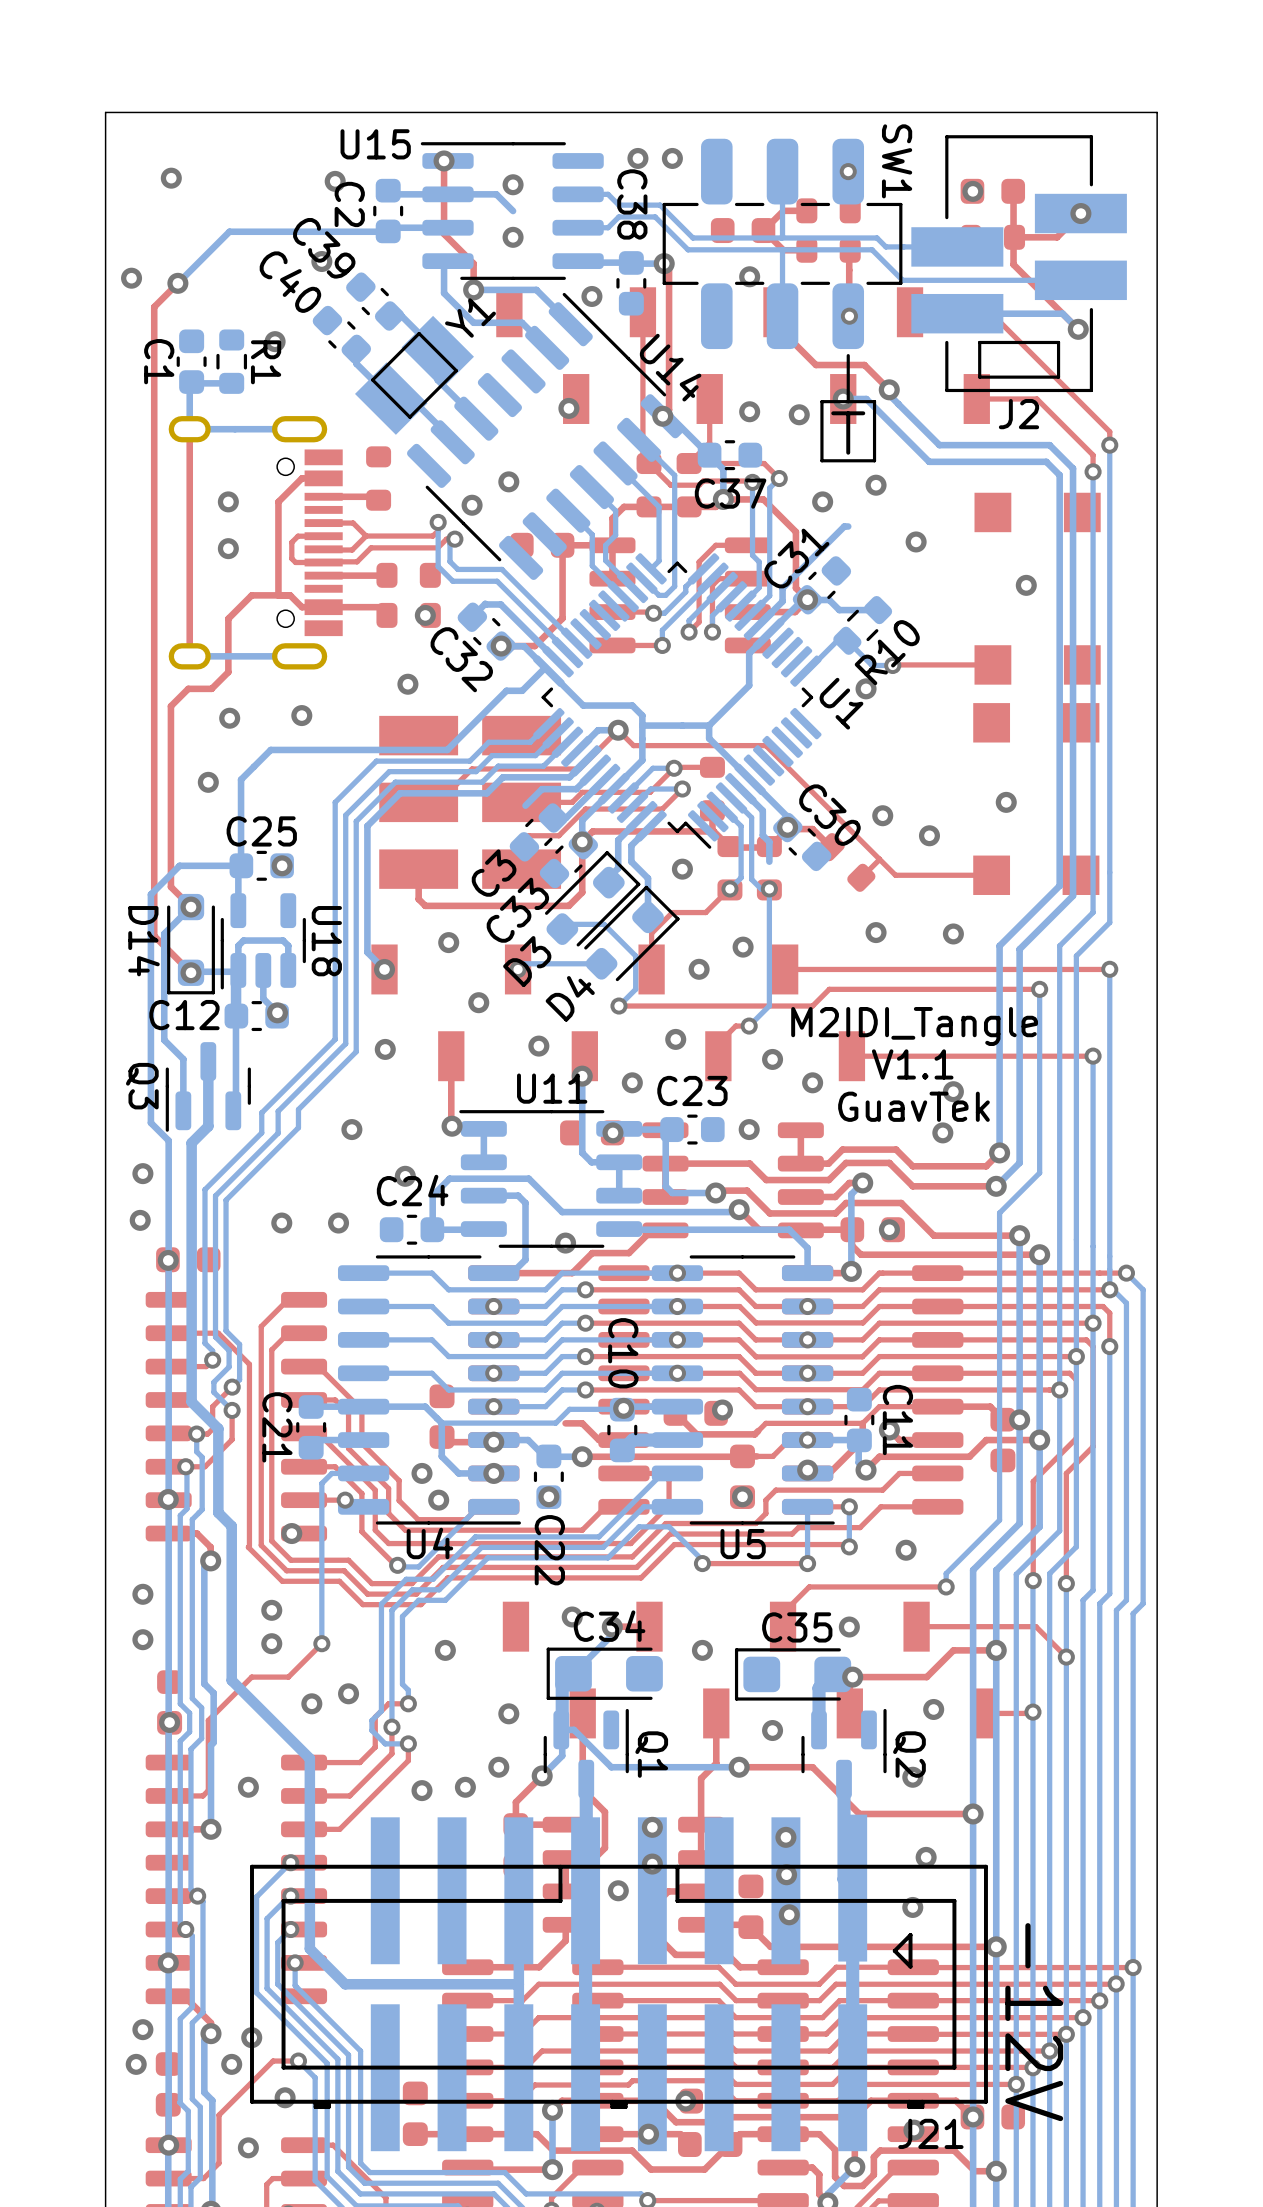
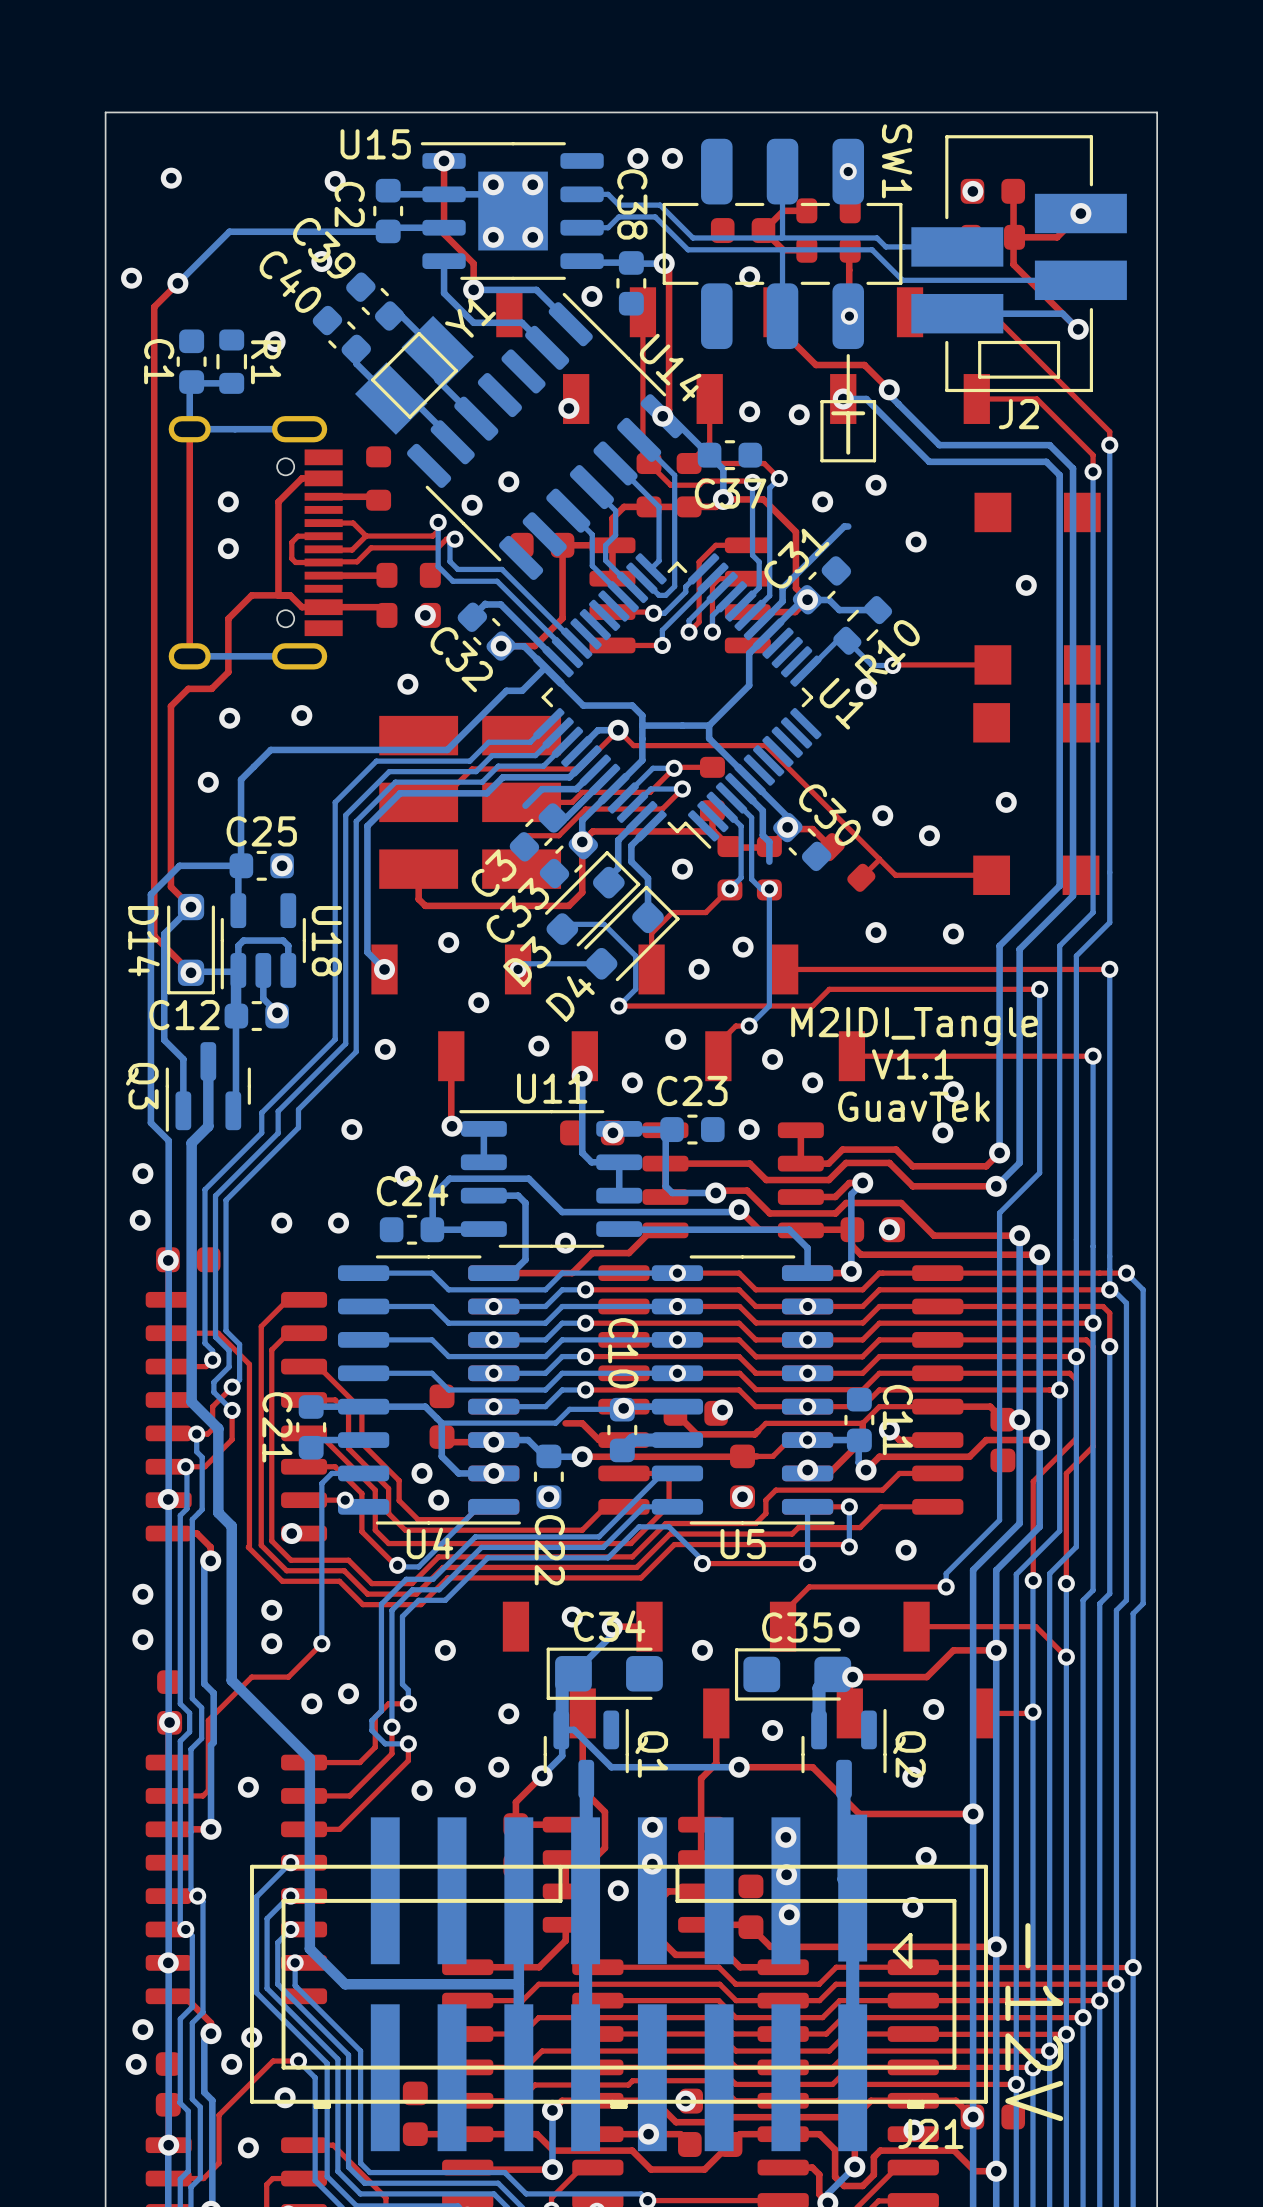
U15 footprint: [420, 142, 604, 280] -> [420, 142, 604, 280]
via: none -> (493, 184)
via: (513, 184) -> none
via: none -> (532, 184)
via: none -> (493, 237)
via: (513, 237) -> none
via: none -> (532, 237)

